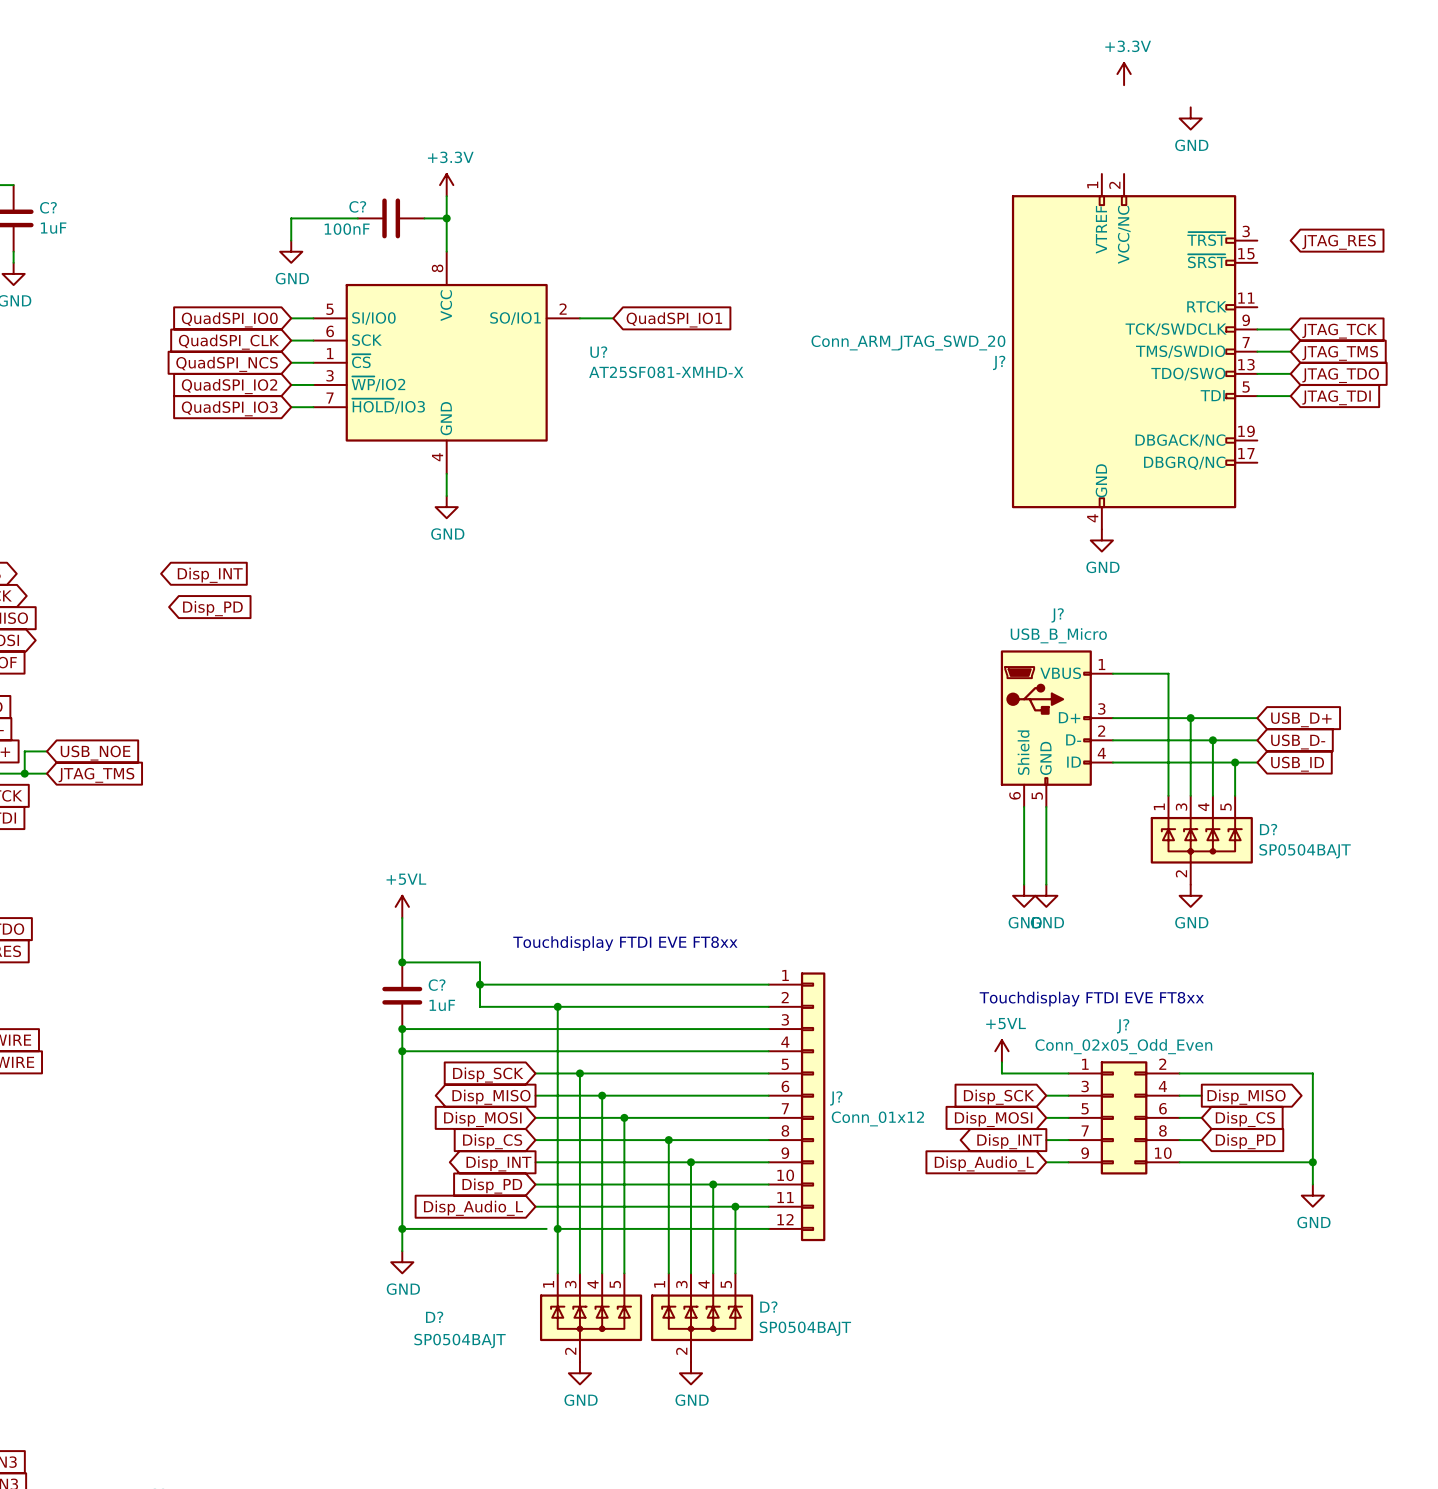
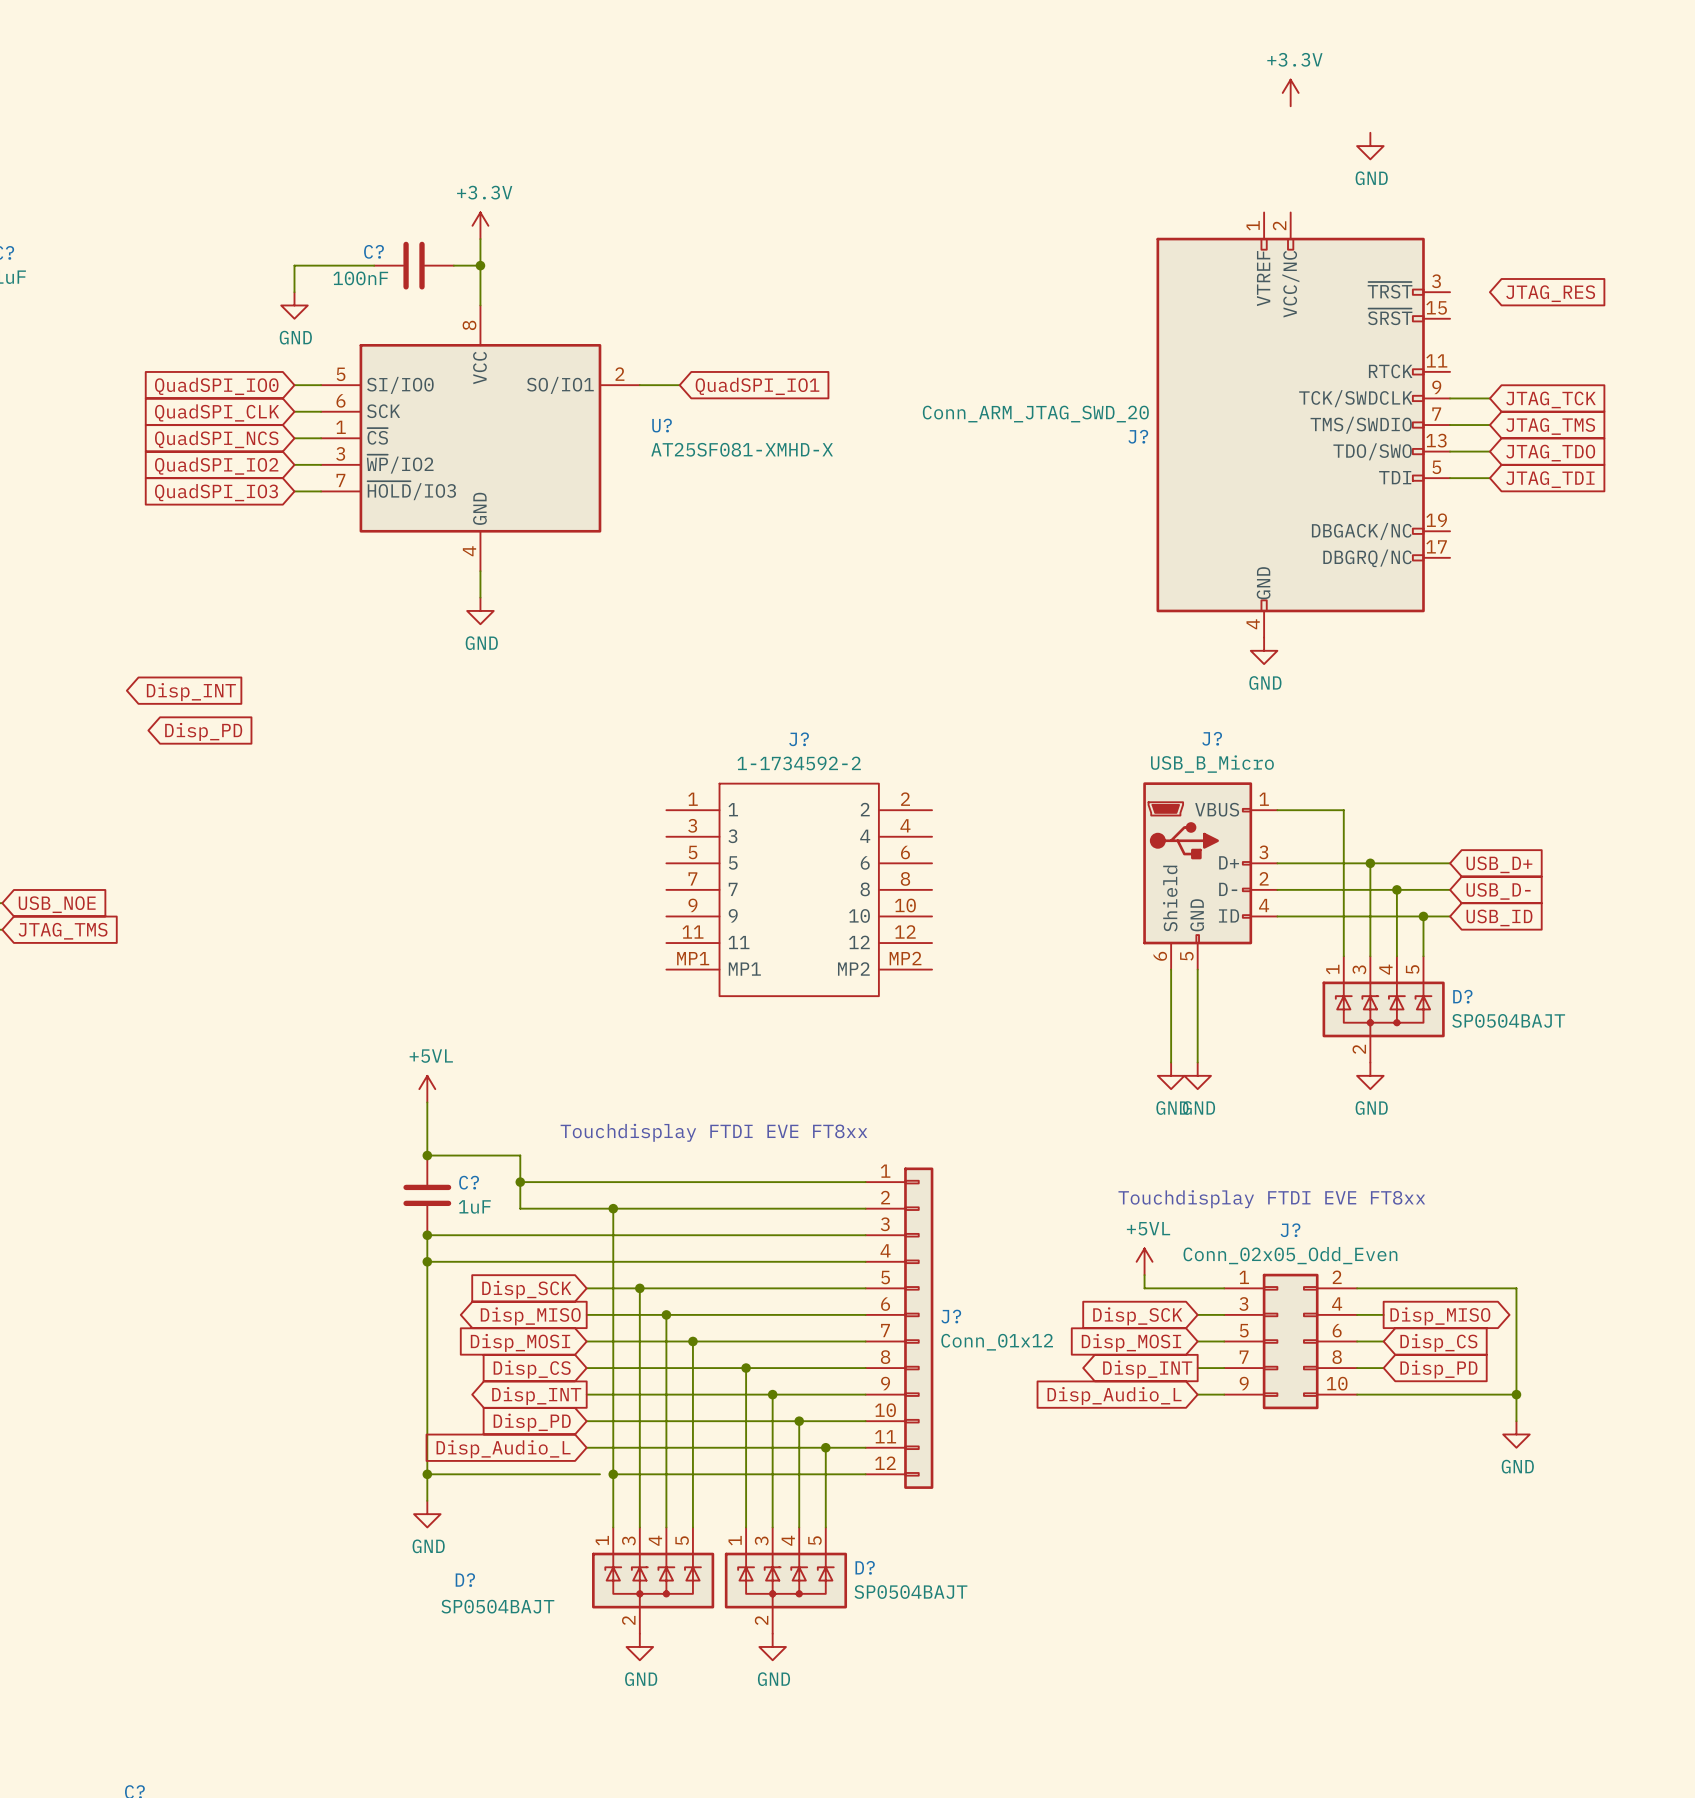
J?: none -> 1-1734592-2 (799, 889)

